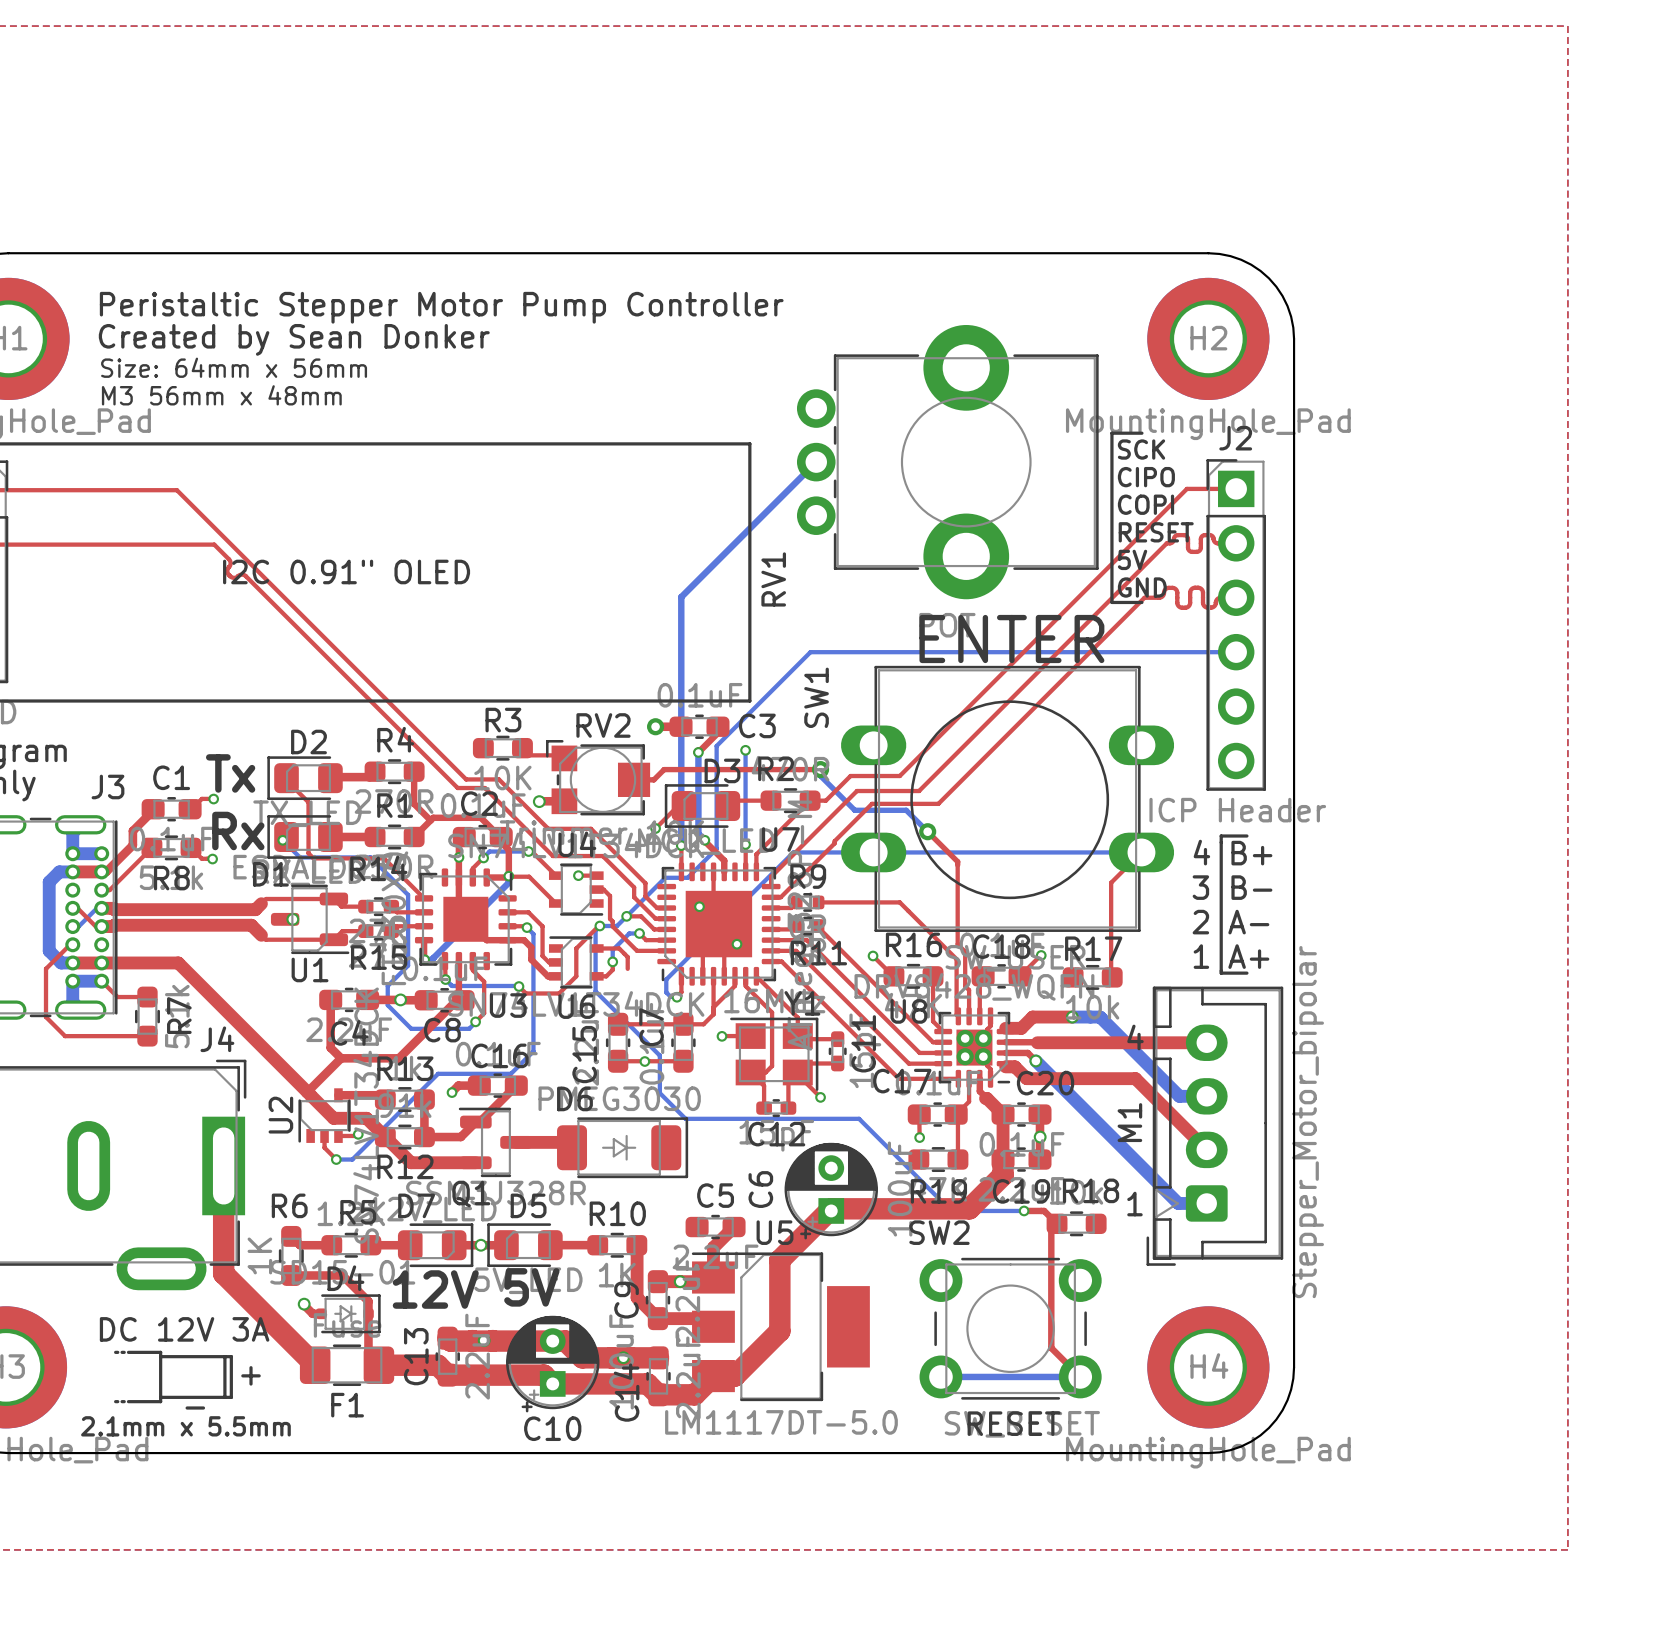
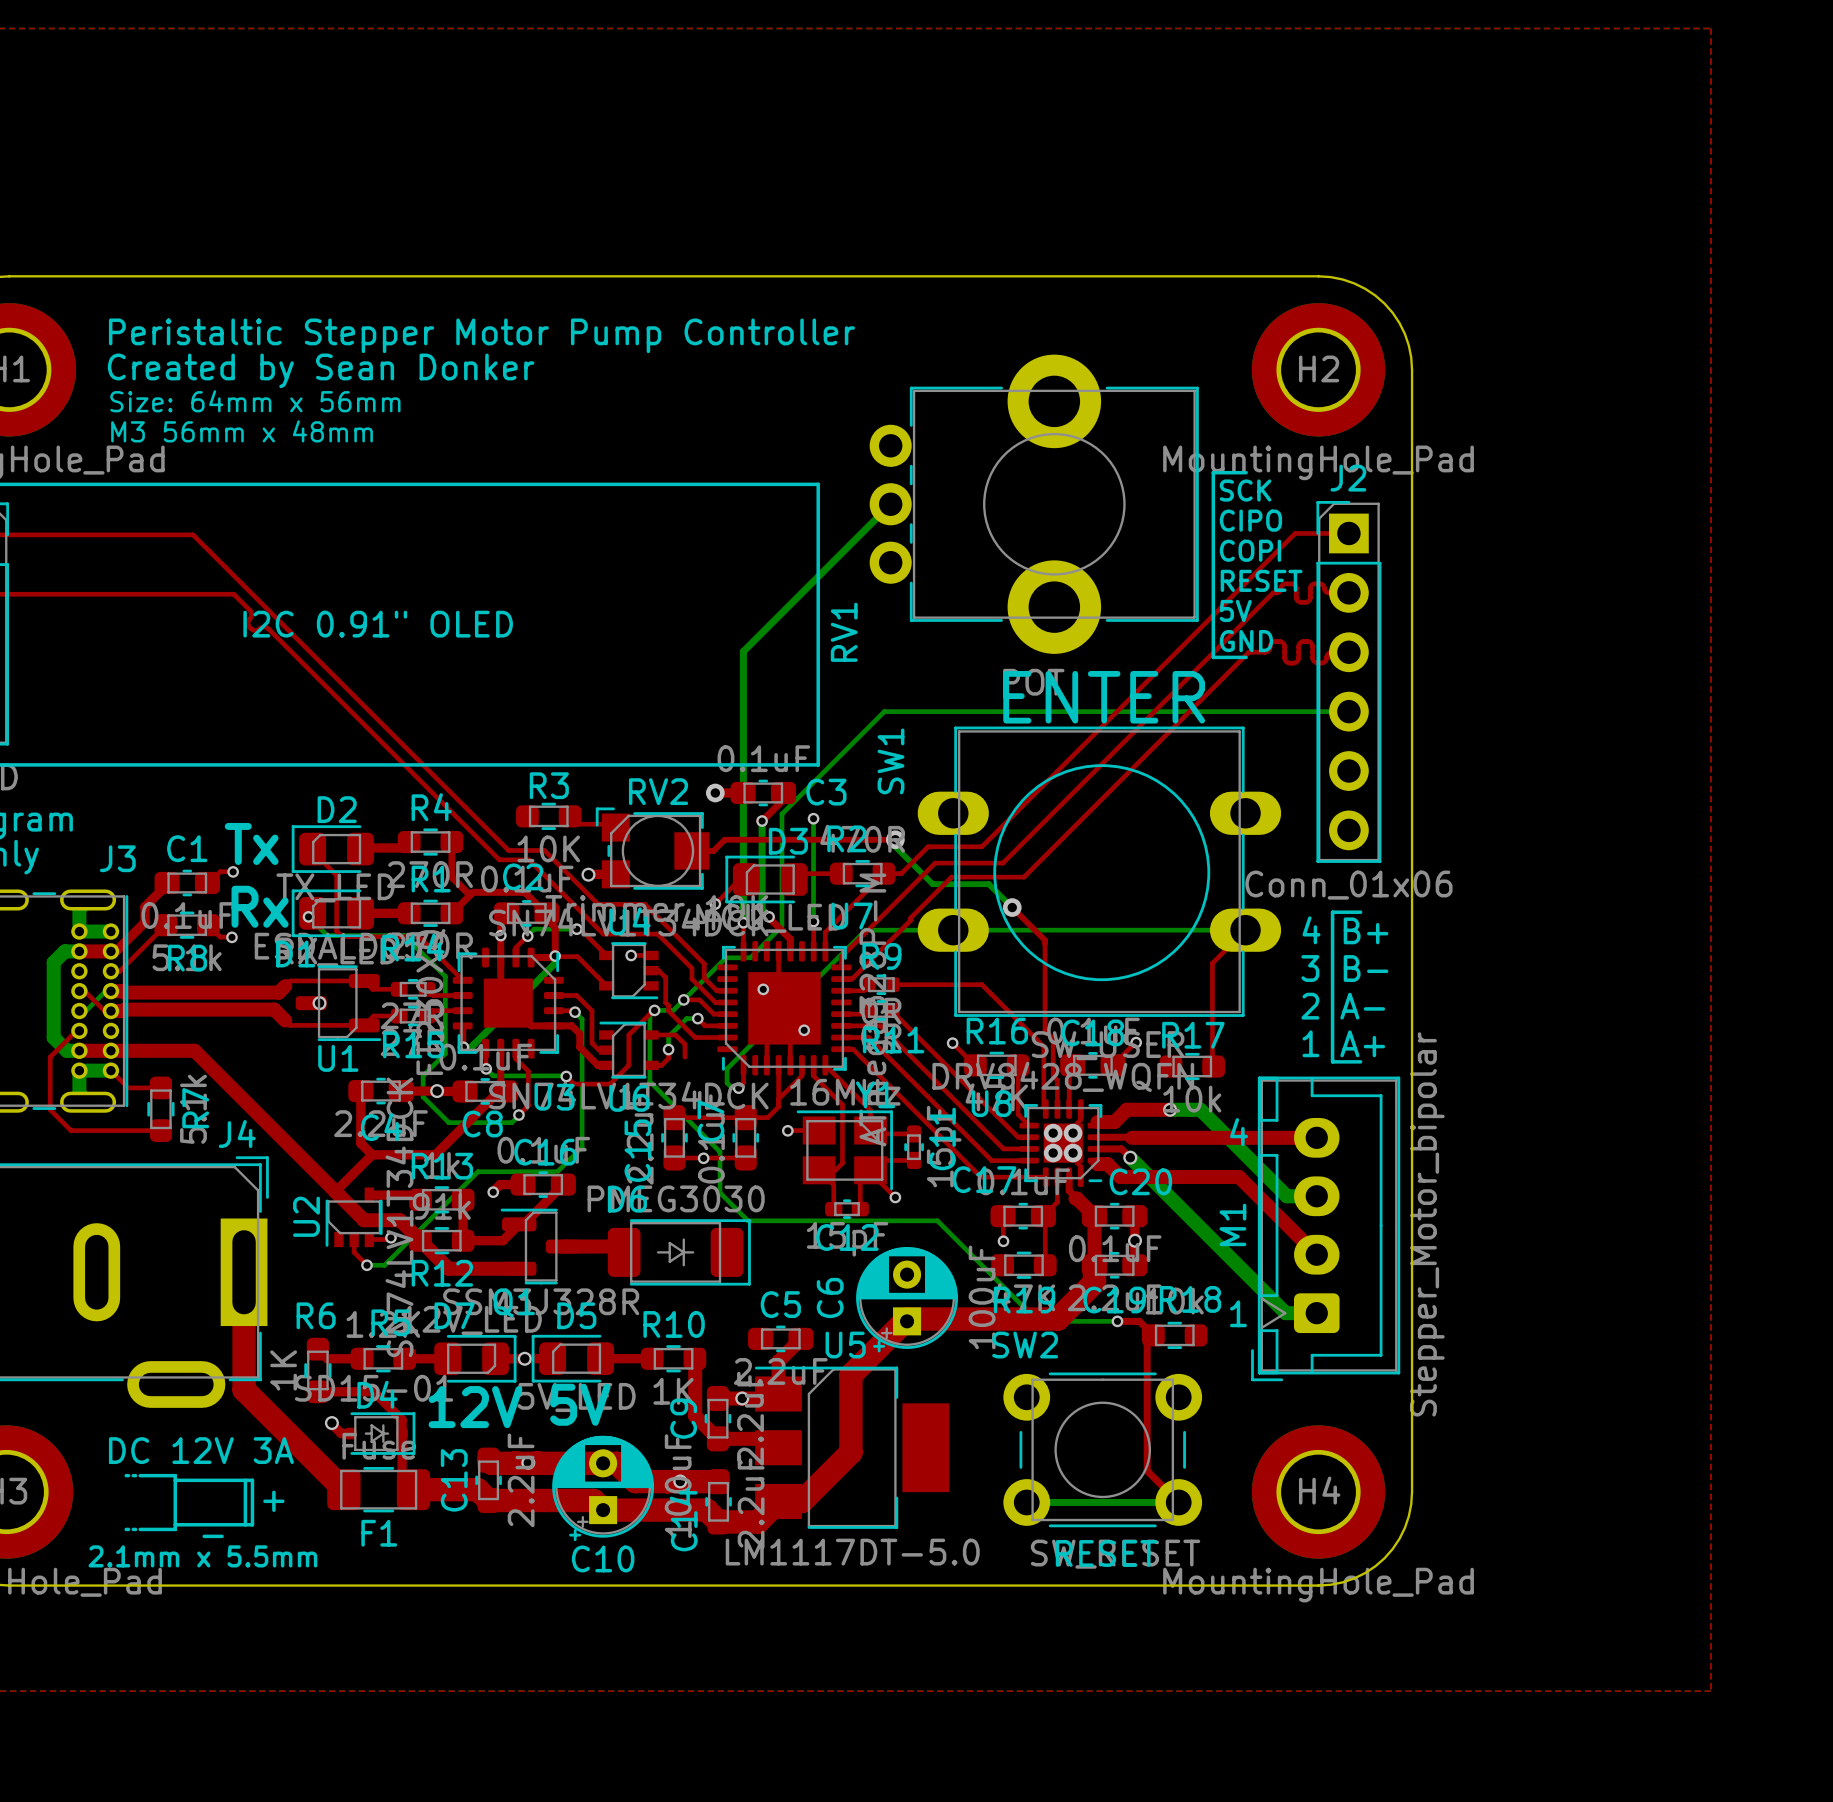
J2 value: ICP Header (1237, 810) -> Conn_01x06 (1348, 885)

